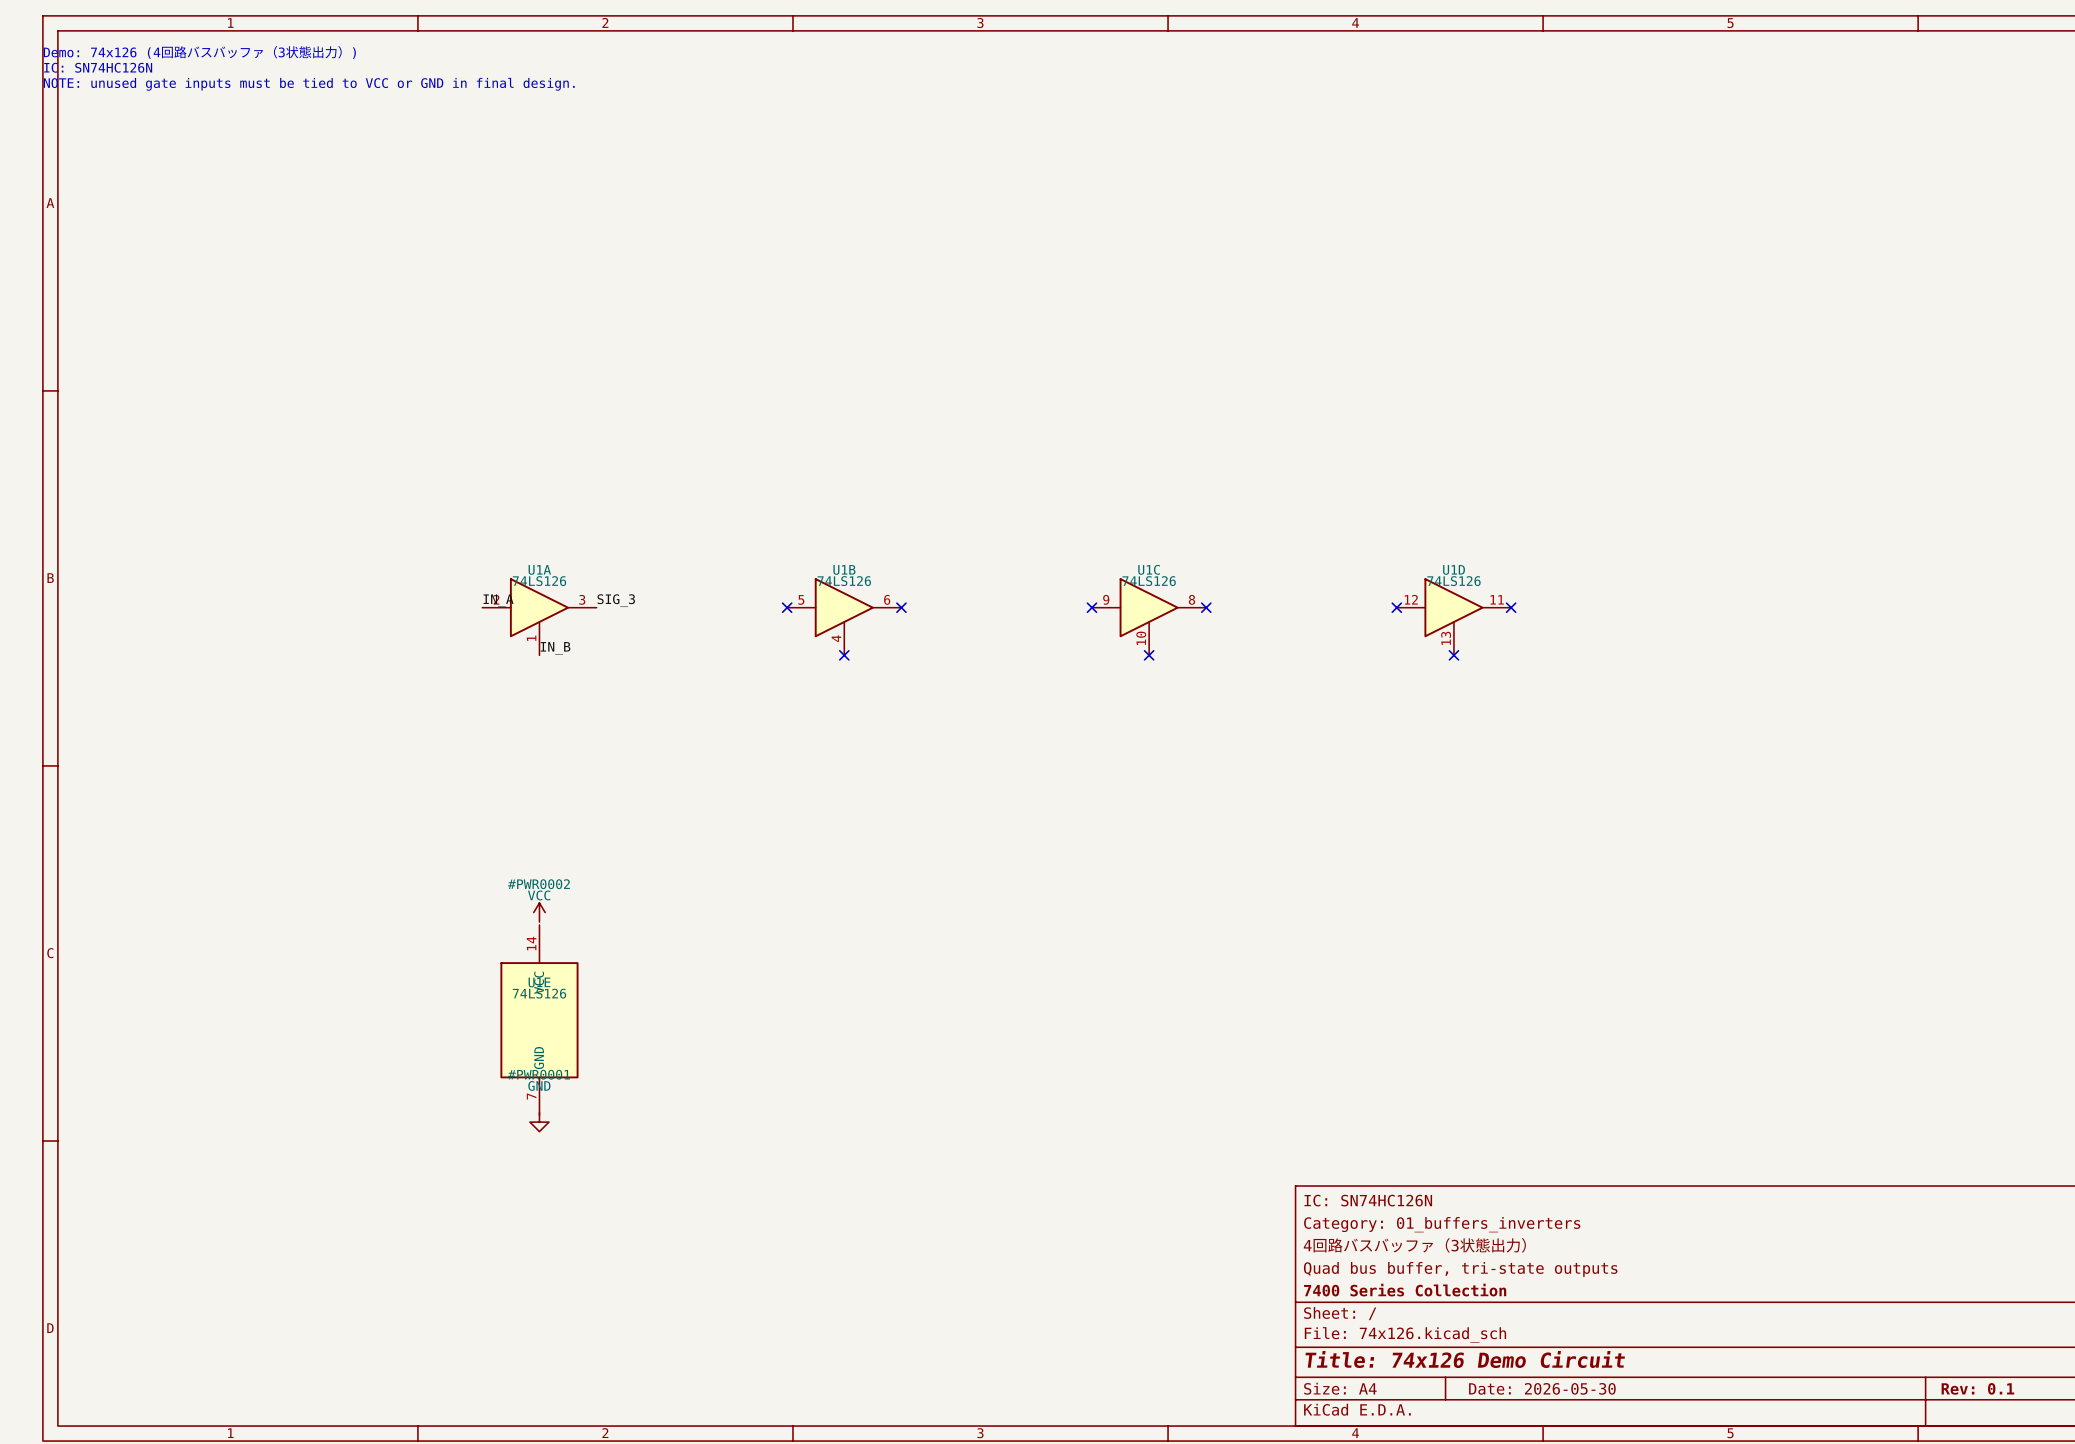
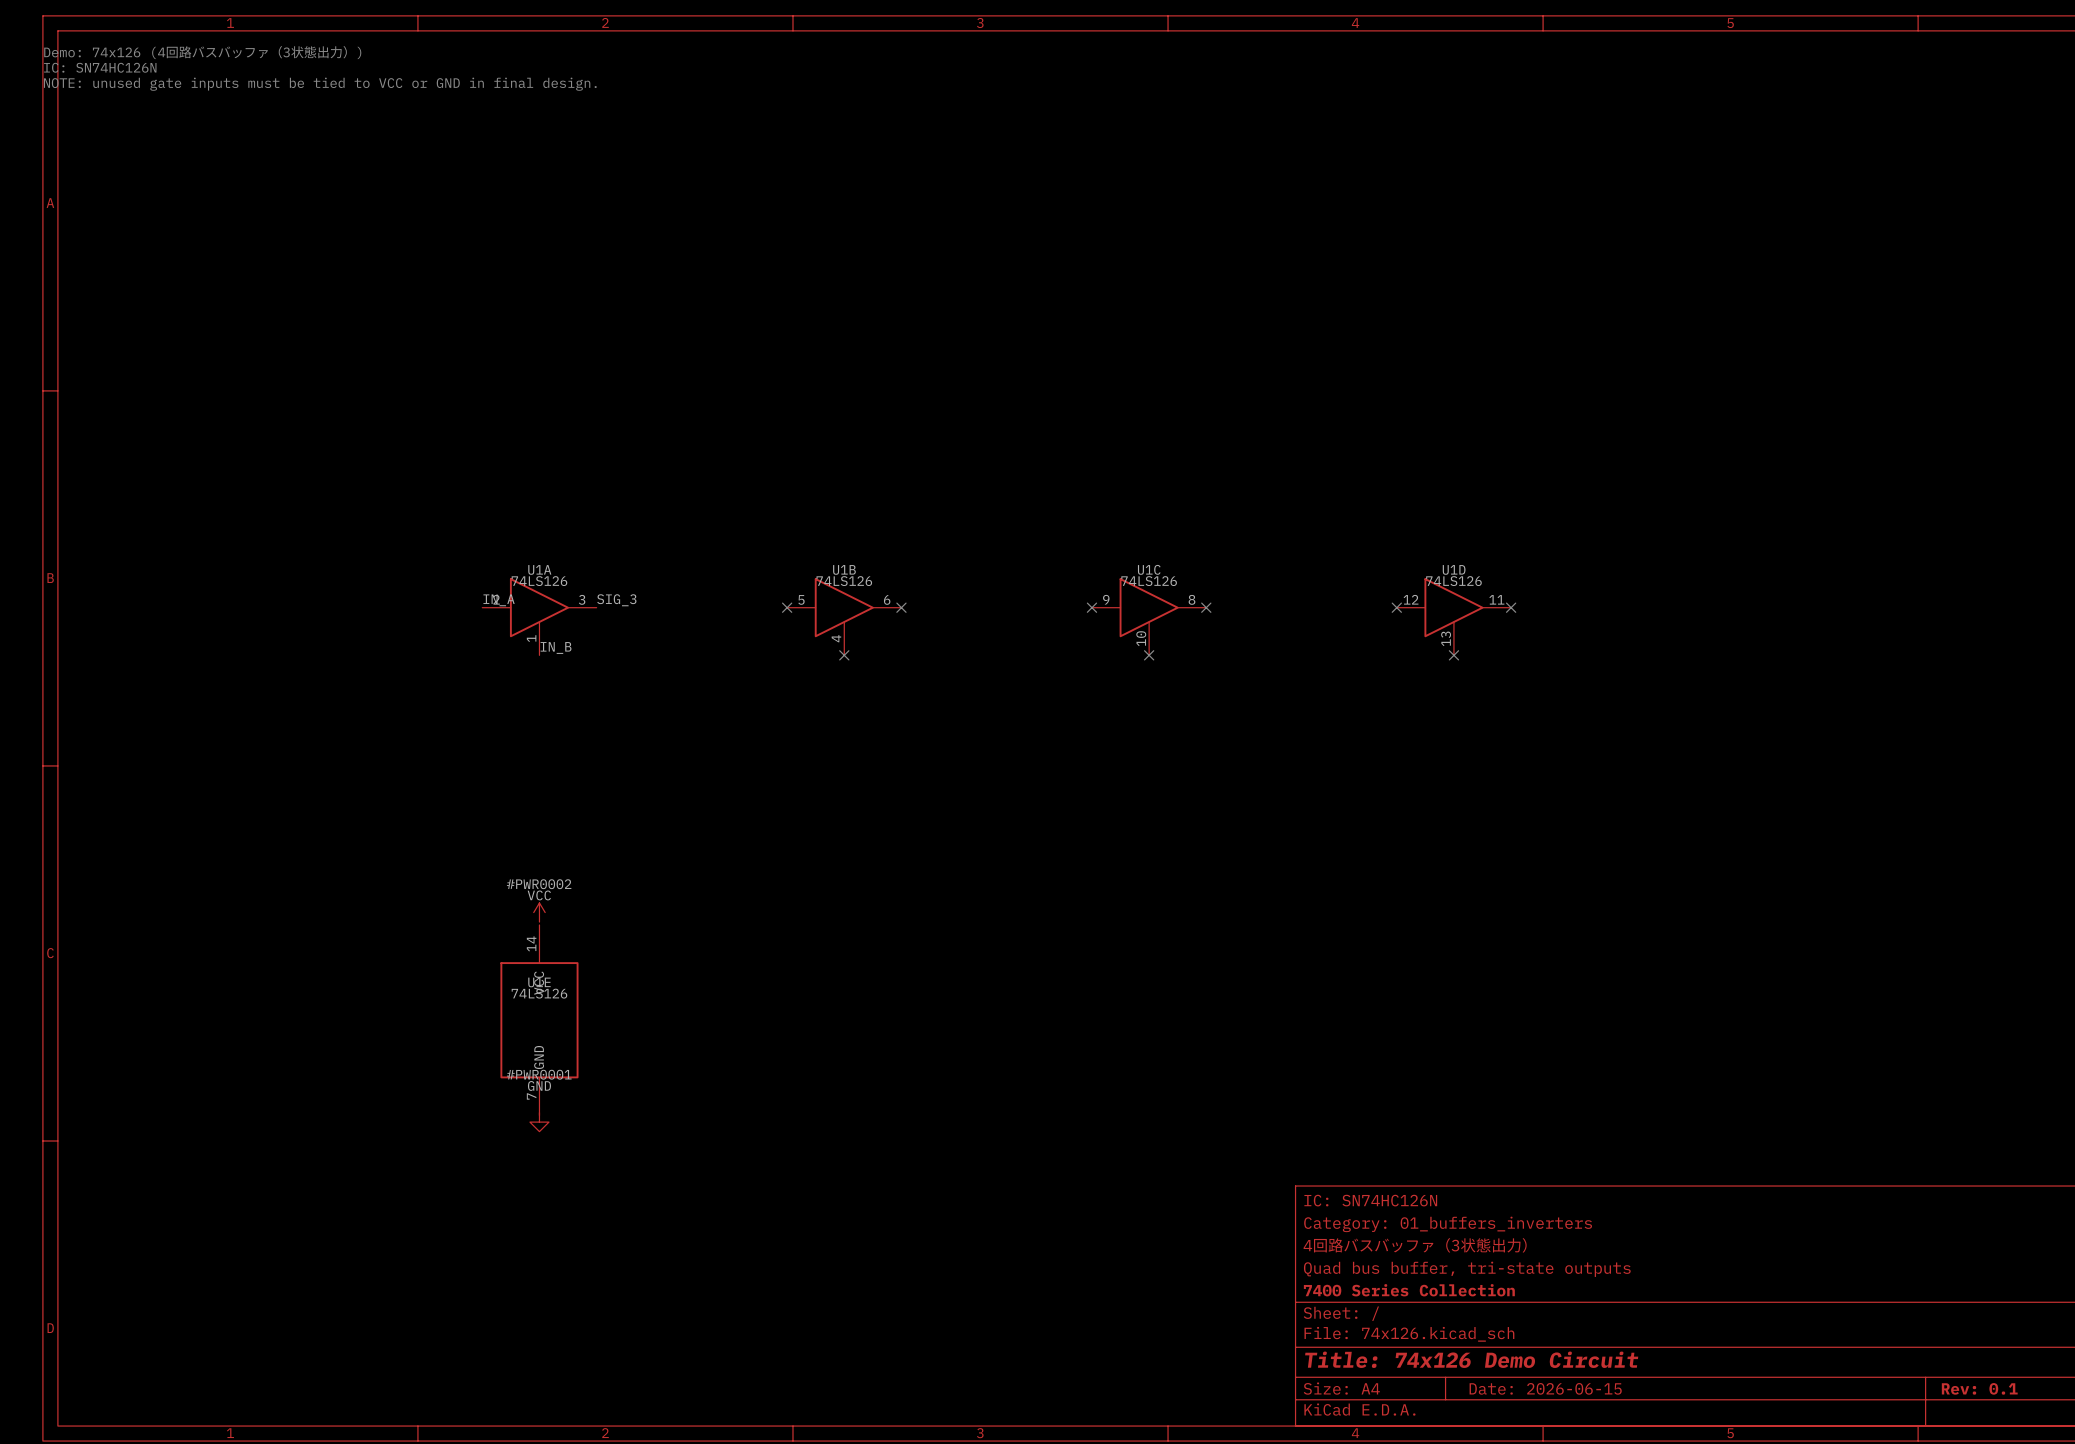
title block: Date: 2026-05-30 (1542, 1388) -> Date: 2026-06-15 (1545, 1388)

